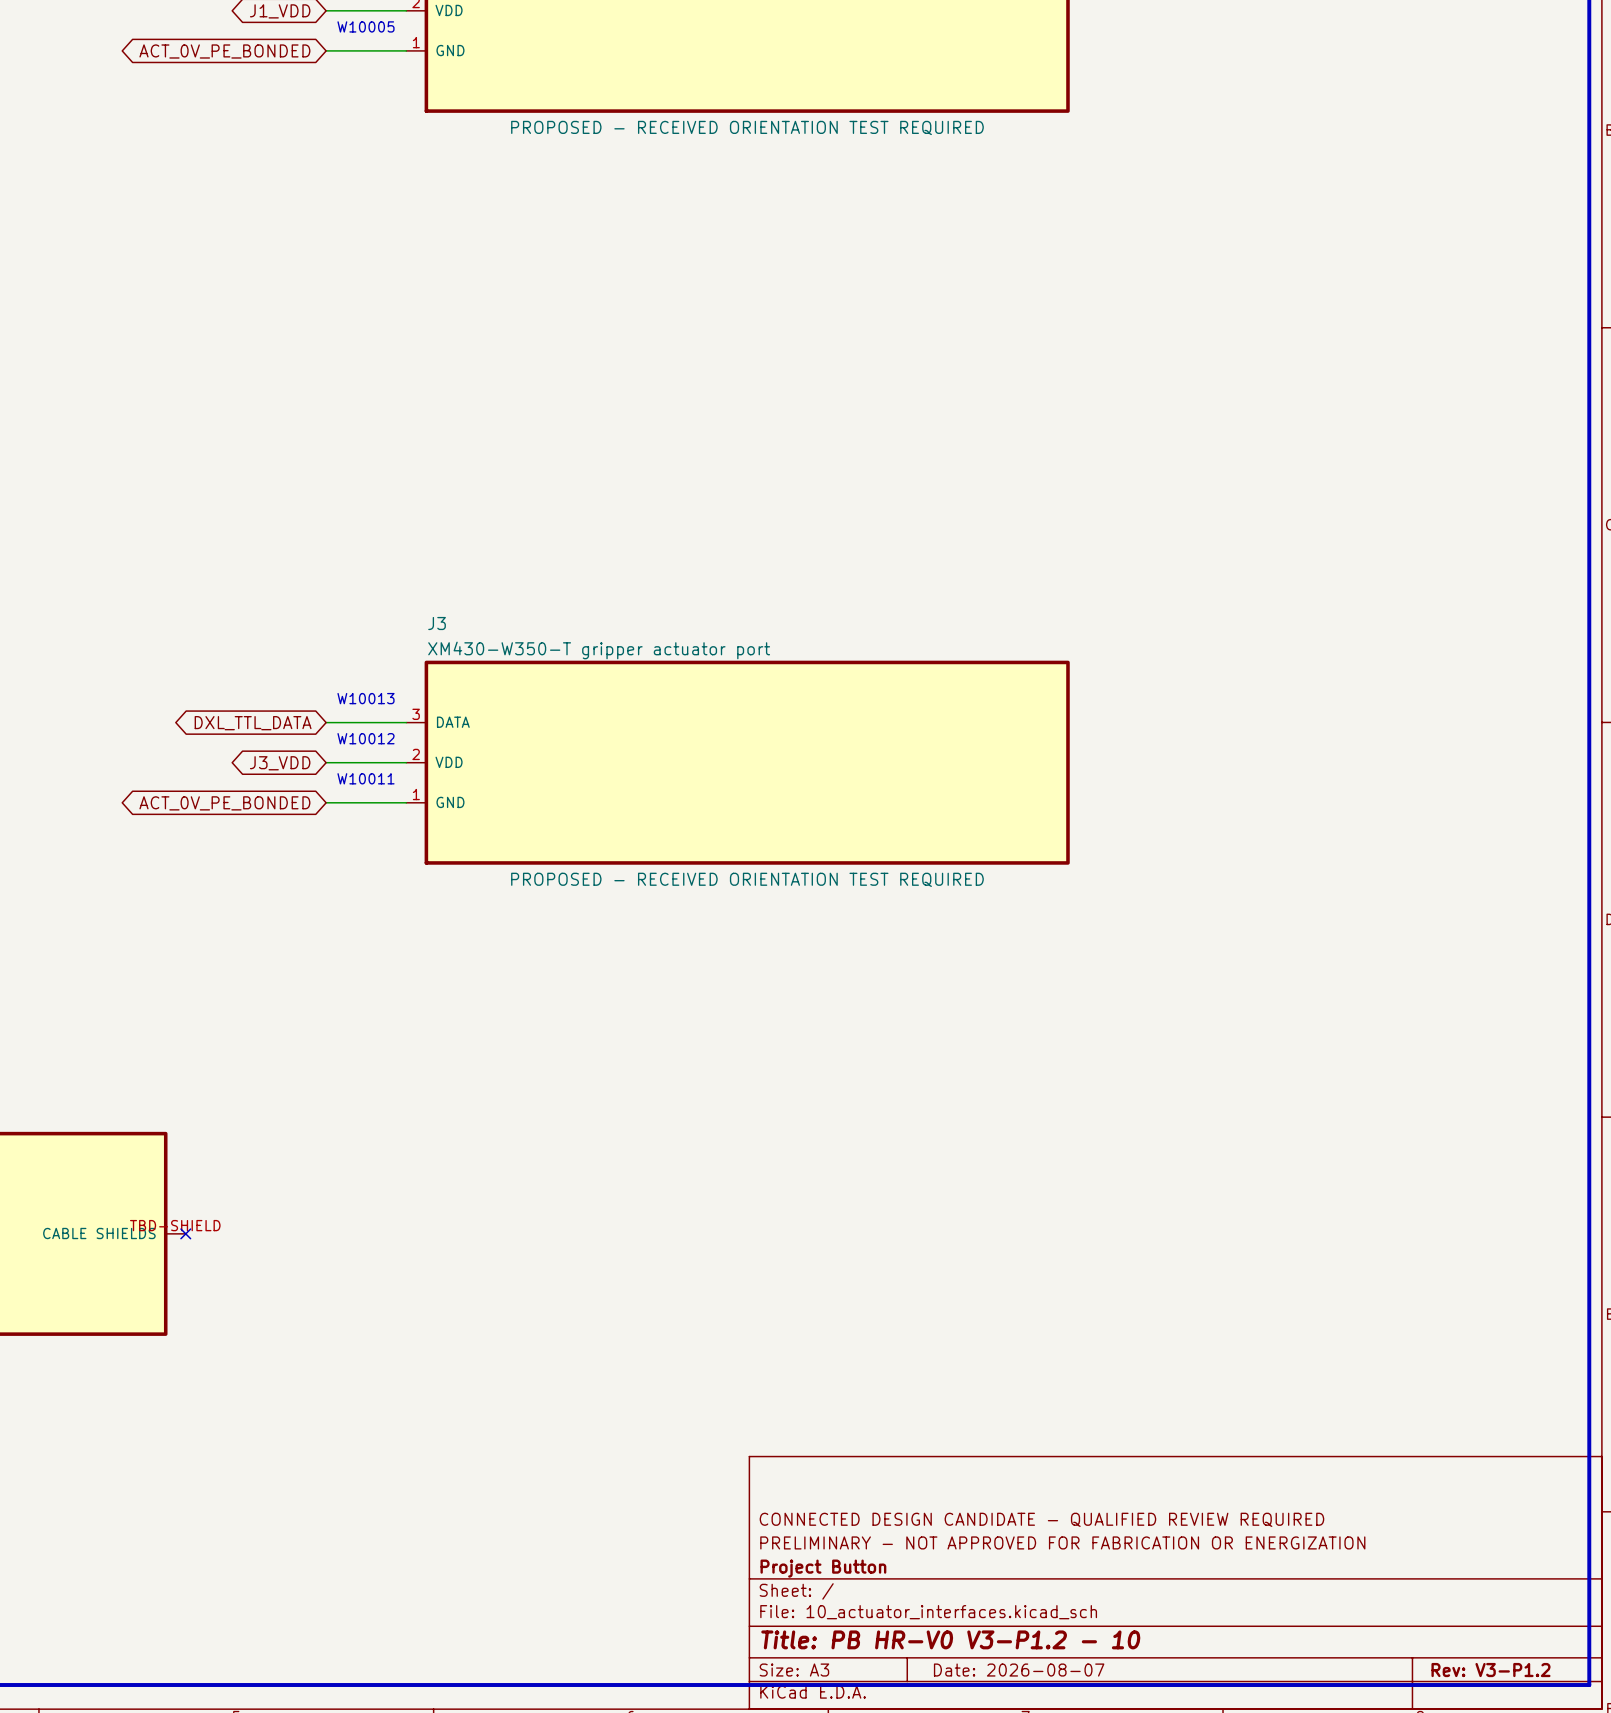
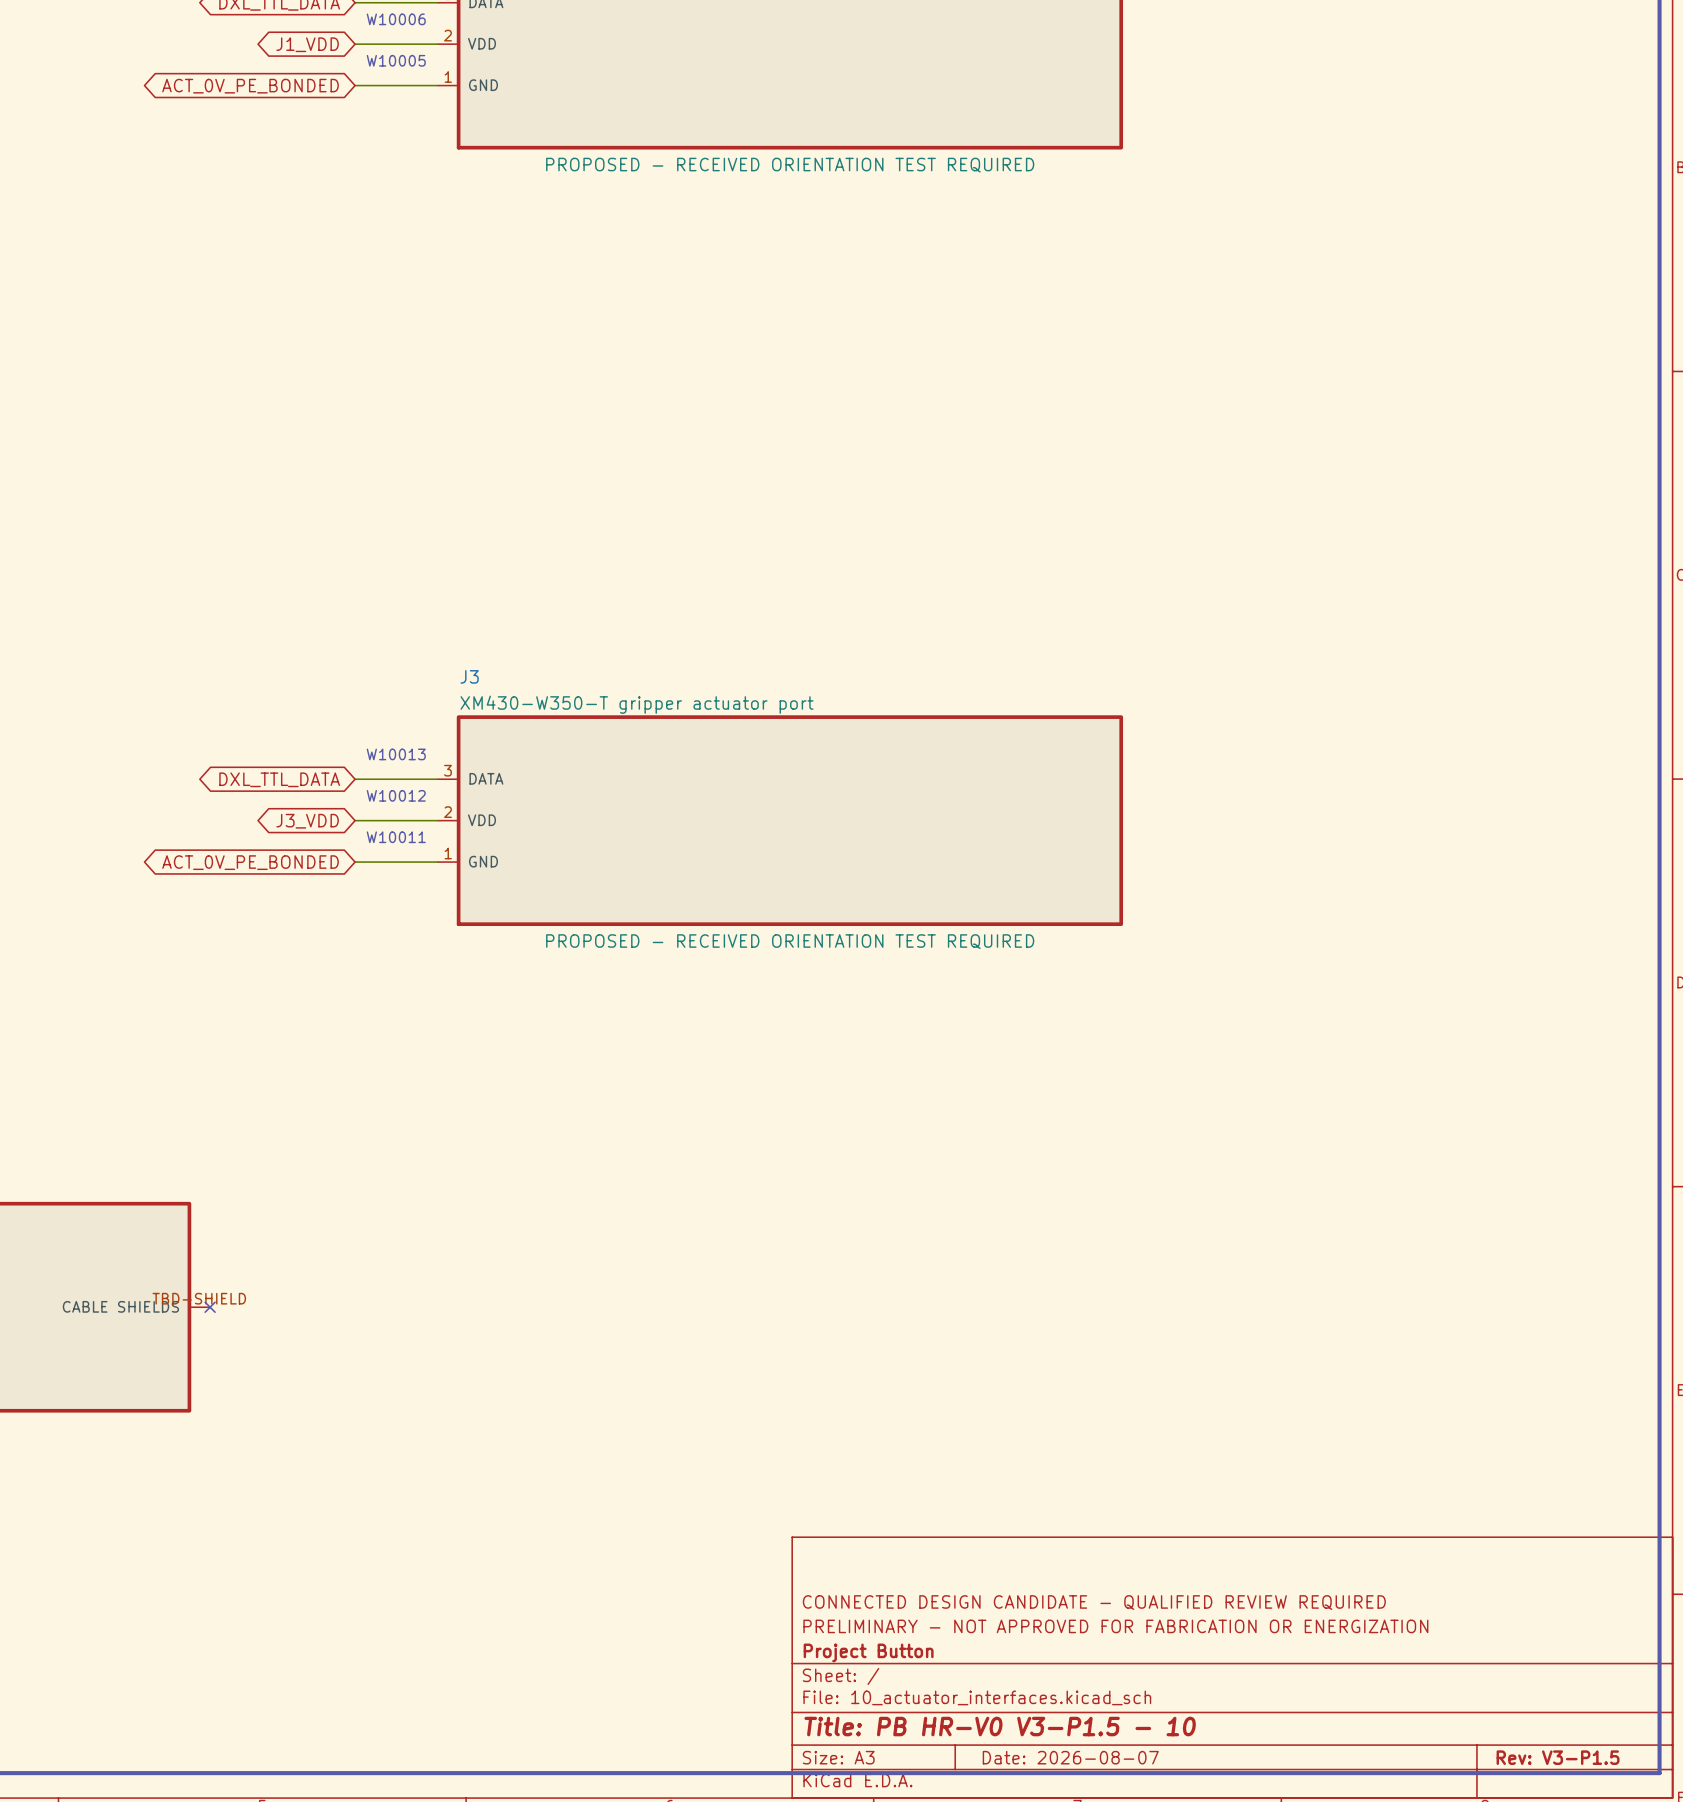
title block: Title: PB HR-V0 V3-P1.2 - 10 (950, 1639) -> Title: PB HR-V0 V3-P1.5 - 10 (1000, 1726)
title block: Rev: V3-P1.2 (1490, 1670) -> Rev: V3-P1.5 (1558, 1757)

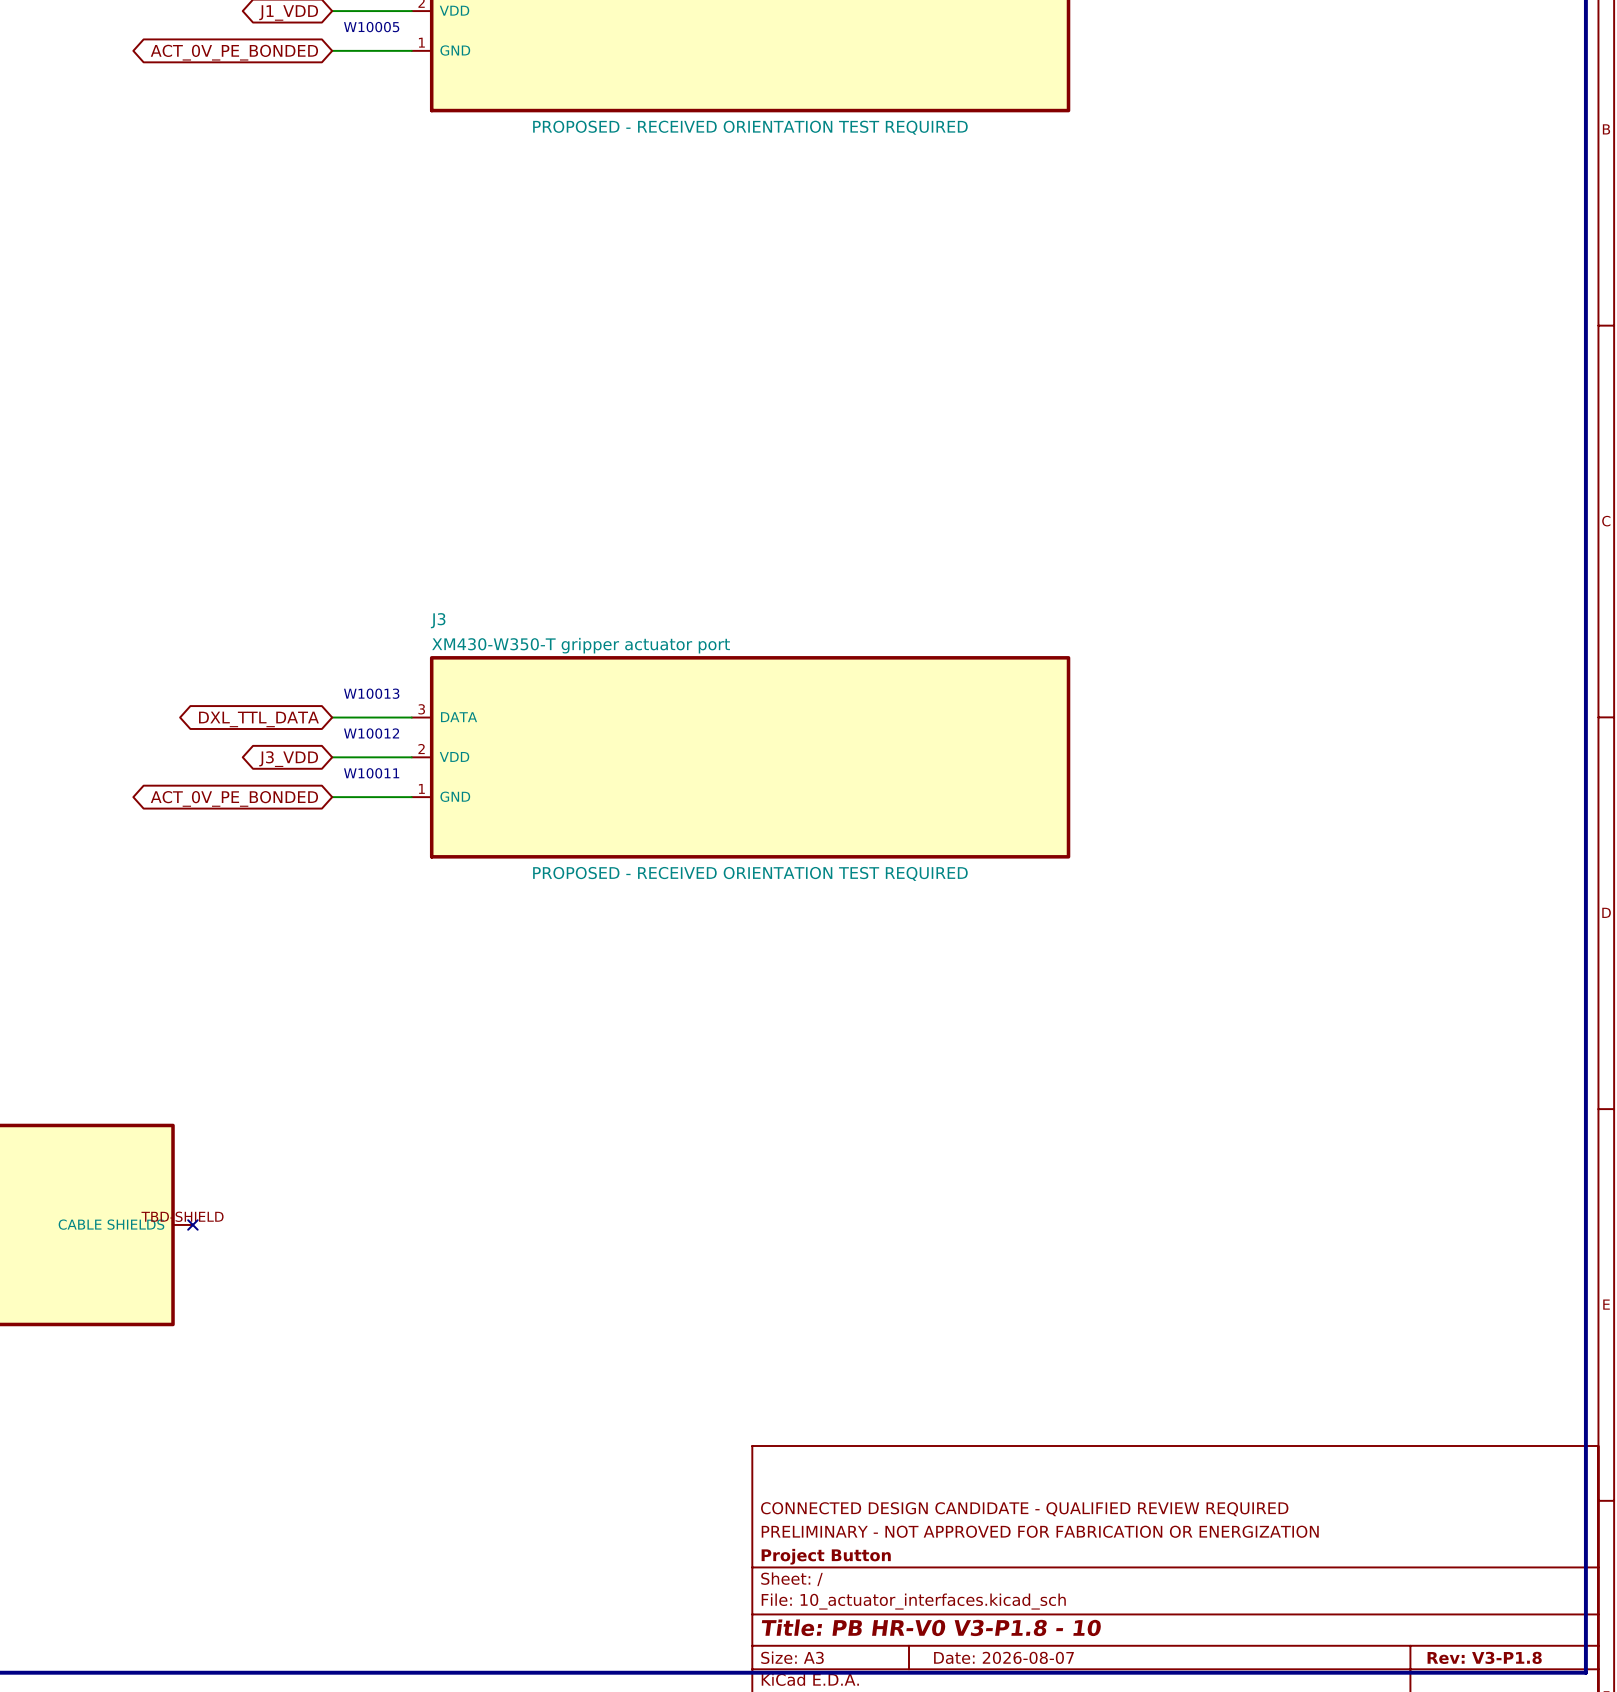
title block: Title: PB HR-V0 V3-P1.5 - 10 (1000, 1726) -> Title: PB HR-V0 V3-P1.8 - 10 (931, 1627)
title block: Rev: V3-P1.5 (1558, 1757) -> Rev: V3-P1.8 (1484, 1657)

